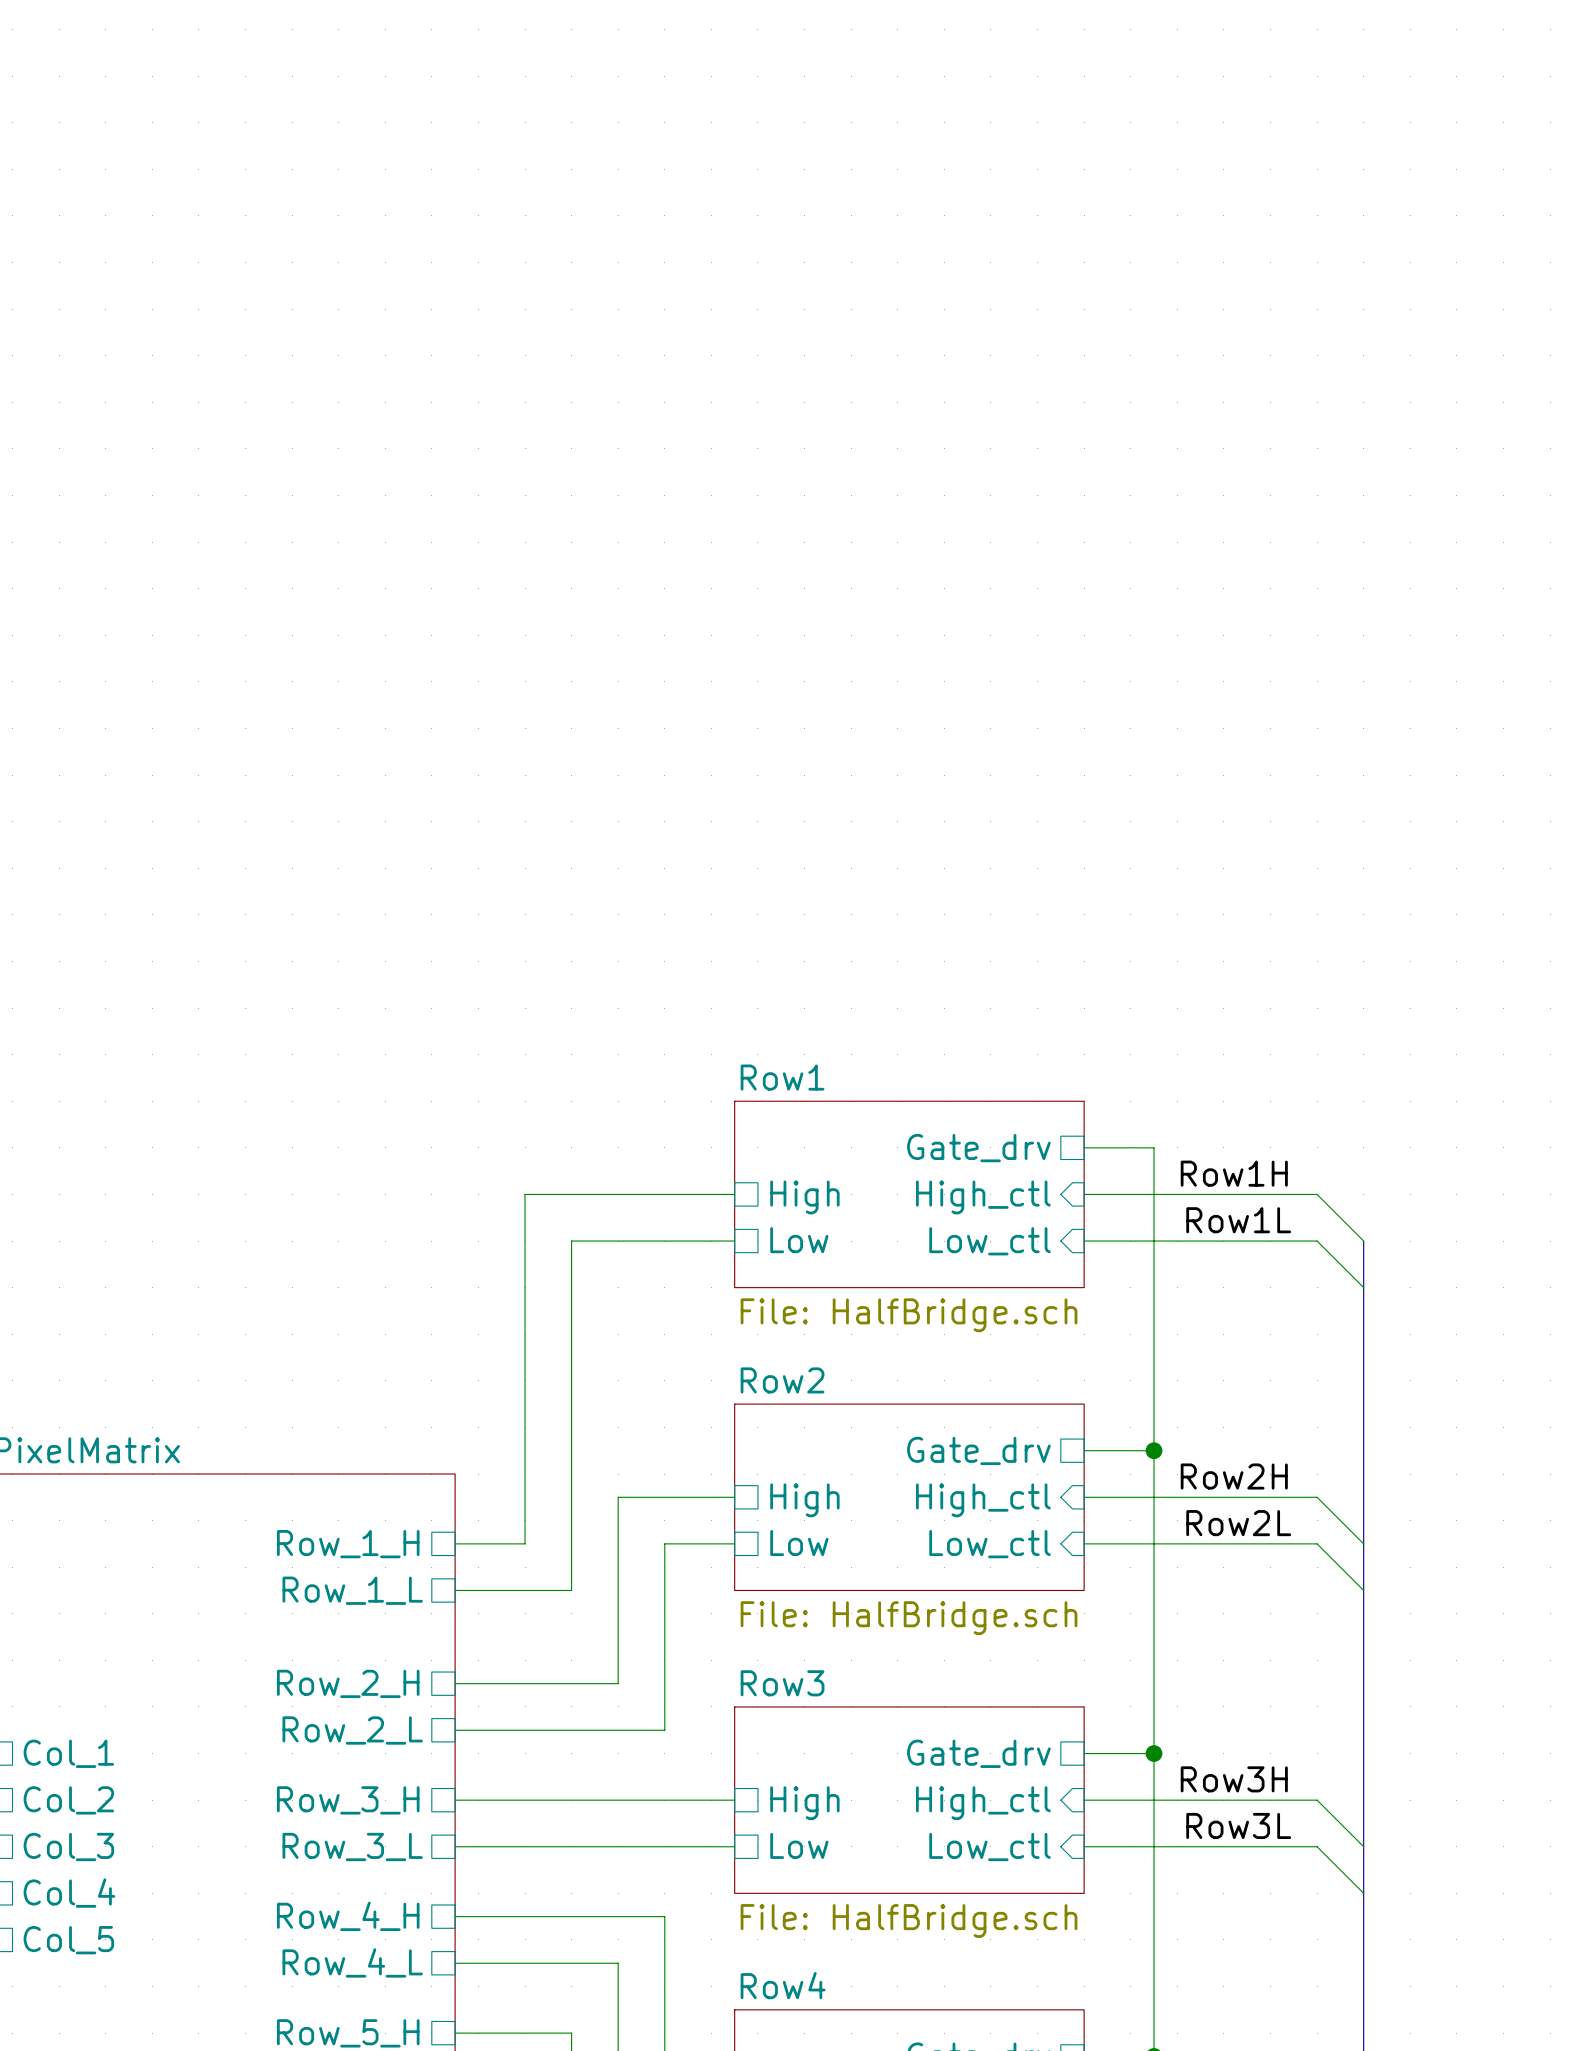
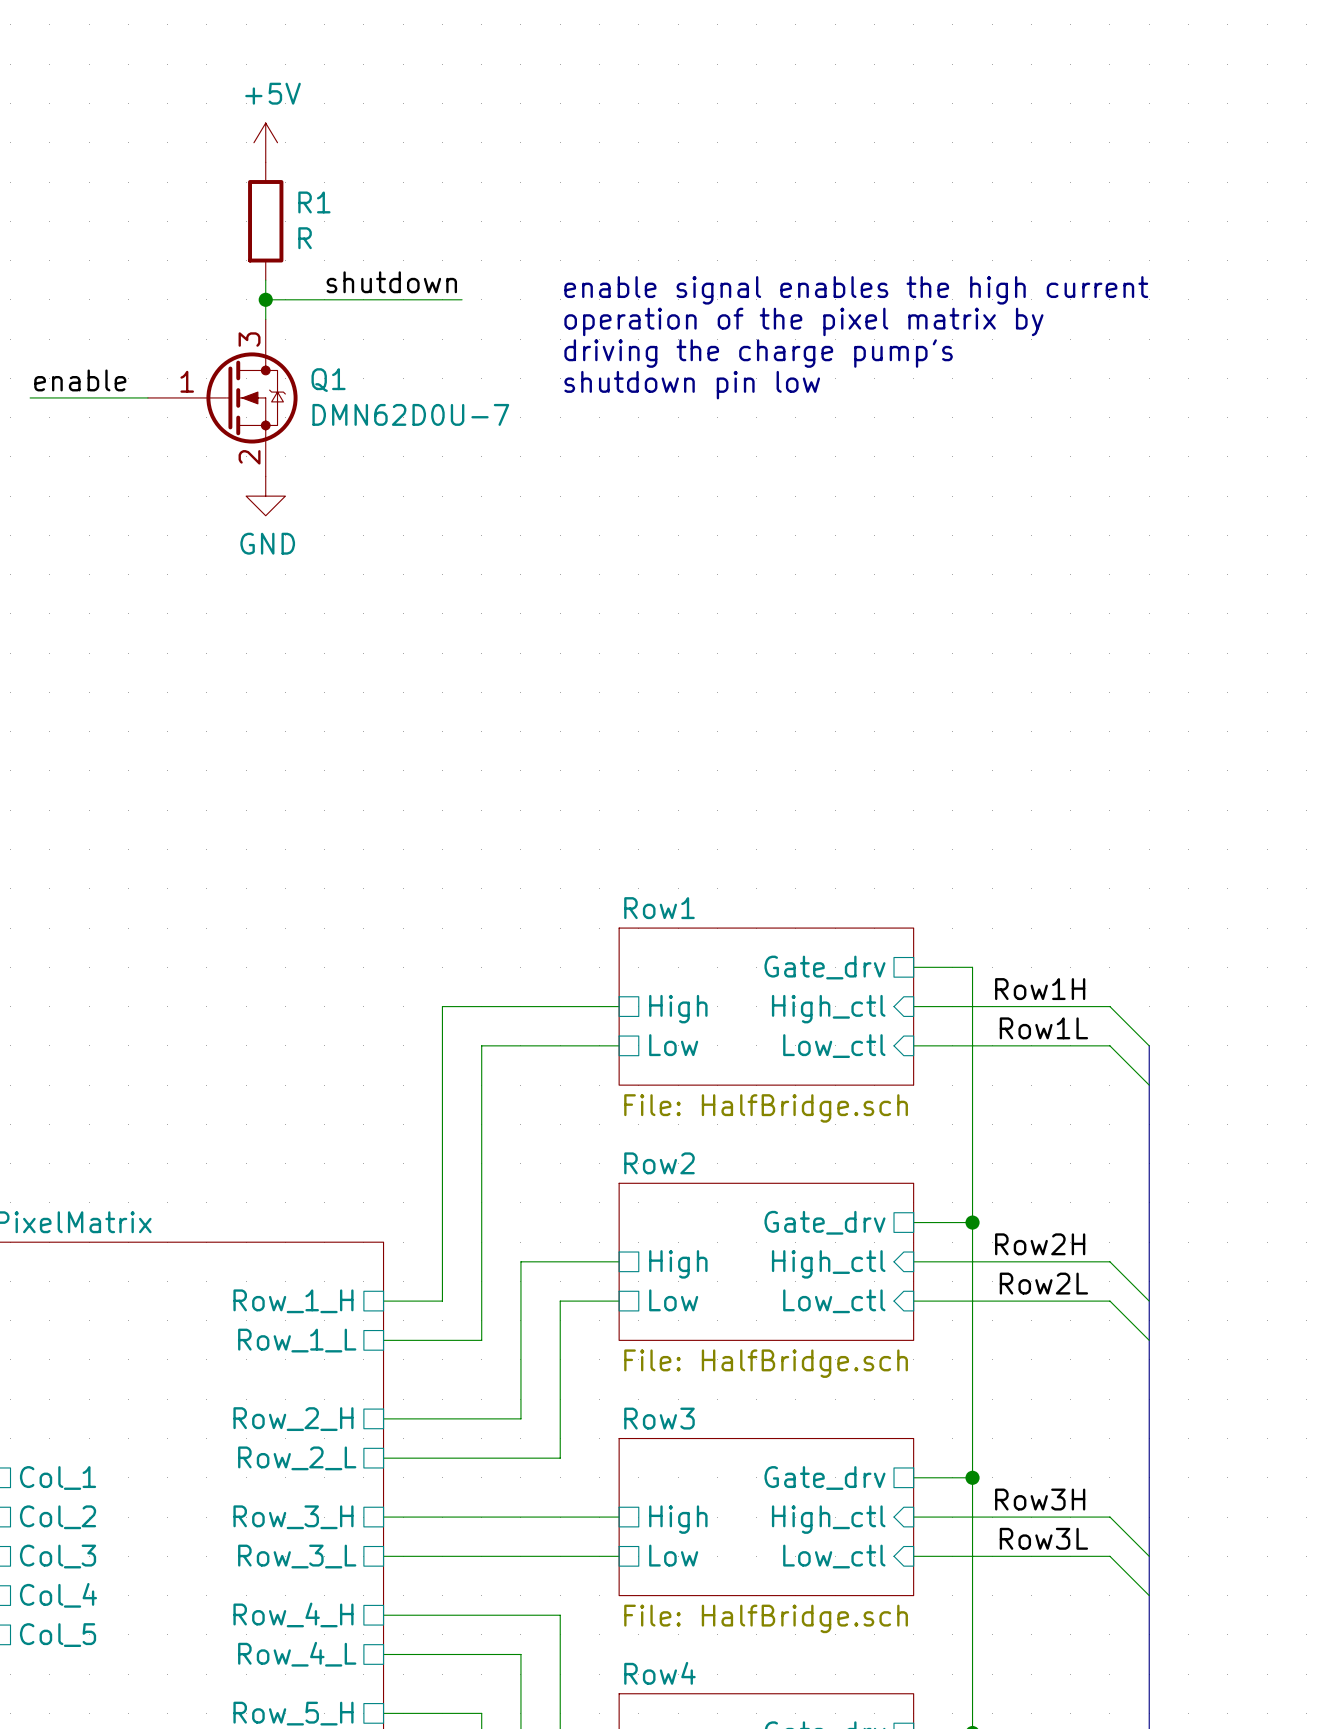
power symbol: none -> +5V (265, 142)
R1: none -> R (265, 221)
wire: none -> (265, 280) (265, 319)
label: none -> shutdown (391, 282)
text: none -> enable signal enables the high current (856, 290)
wire: none -> (265, 299) (462, 299)
junction: none -> (265, 299)
text: none -> operation of the pixel matrix by (803, 321)
text: none -> driving the charge pump's (758, 353)
label: none -> enable (80, 380)
text: none -> shutdown pin low (692, 385)
wire: none -> (30, 397) (147, 397)
Q1: none -> DMN62D0U-7 (222, 397)
power symbol: none -> GND (265, 496)

